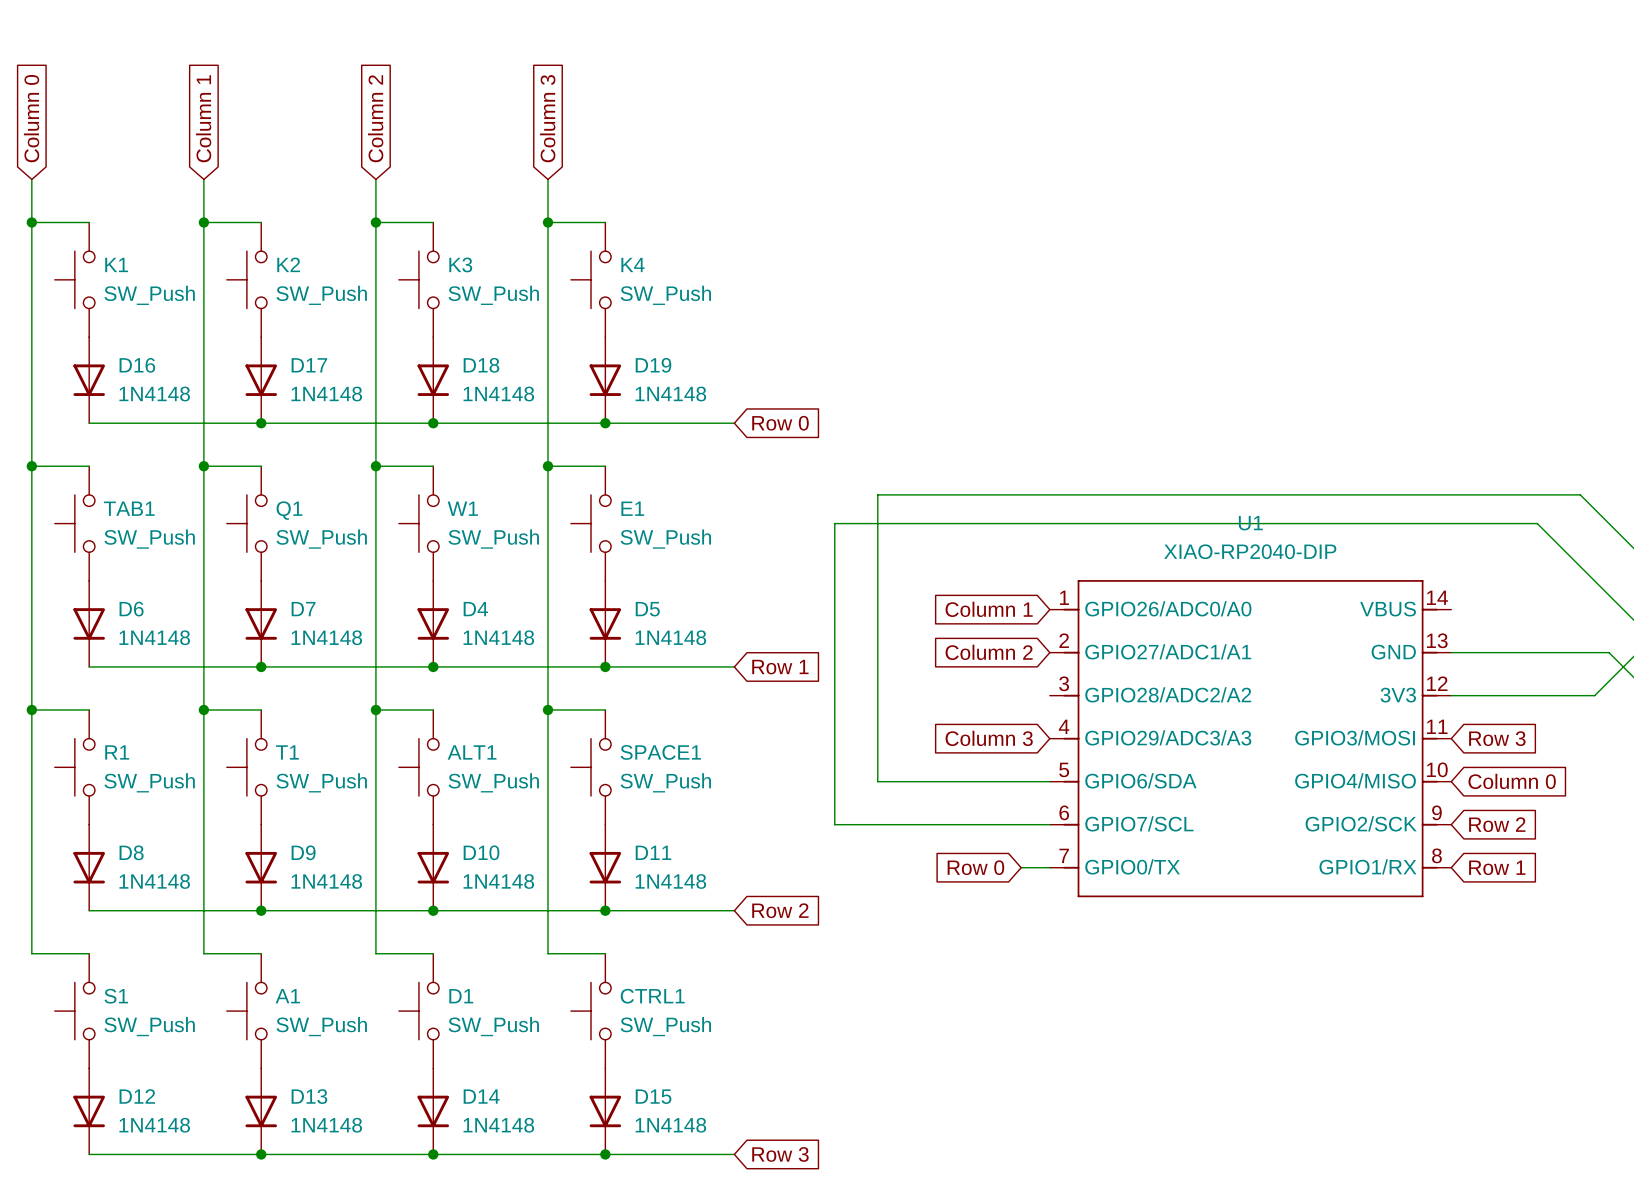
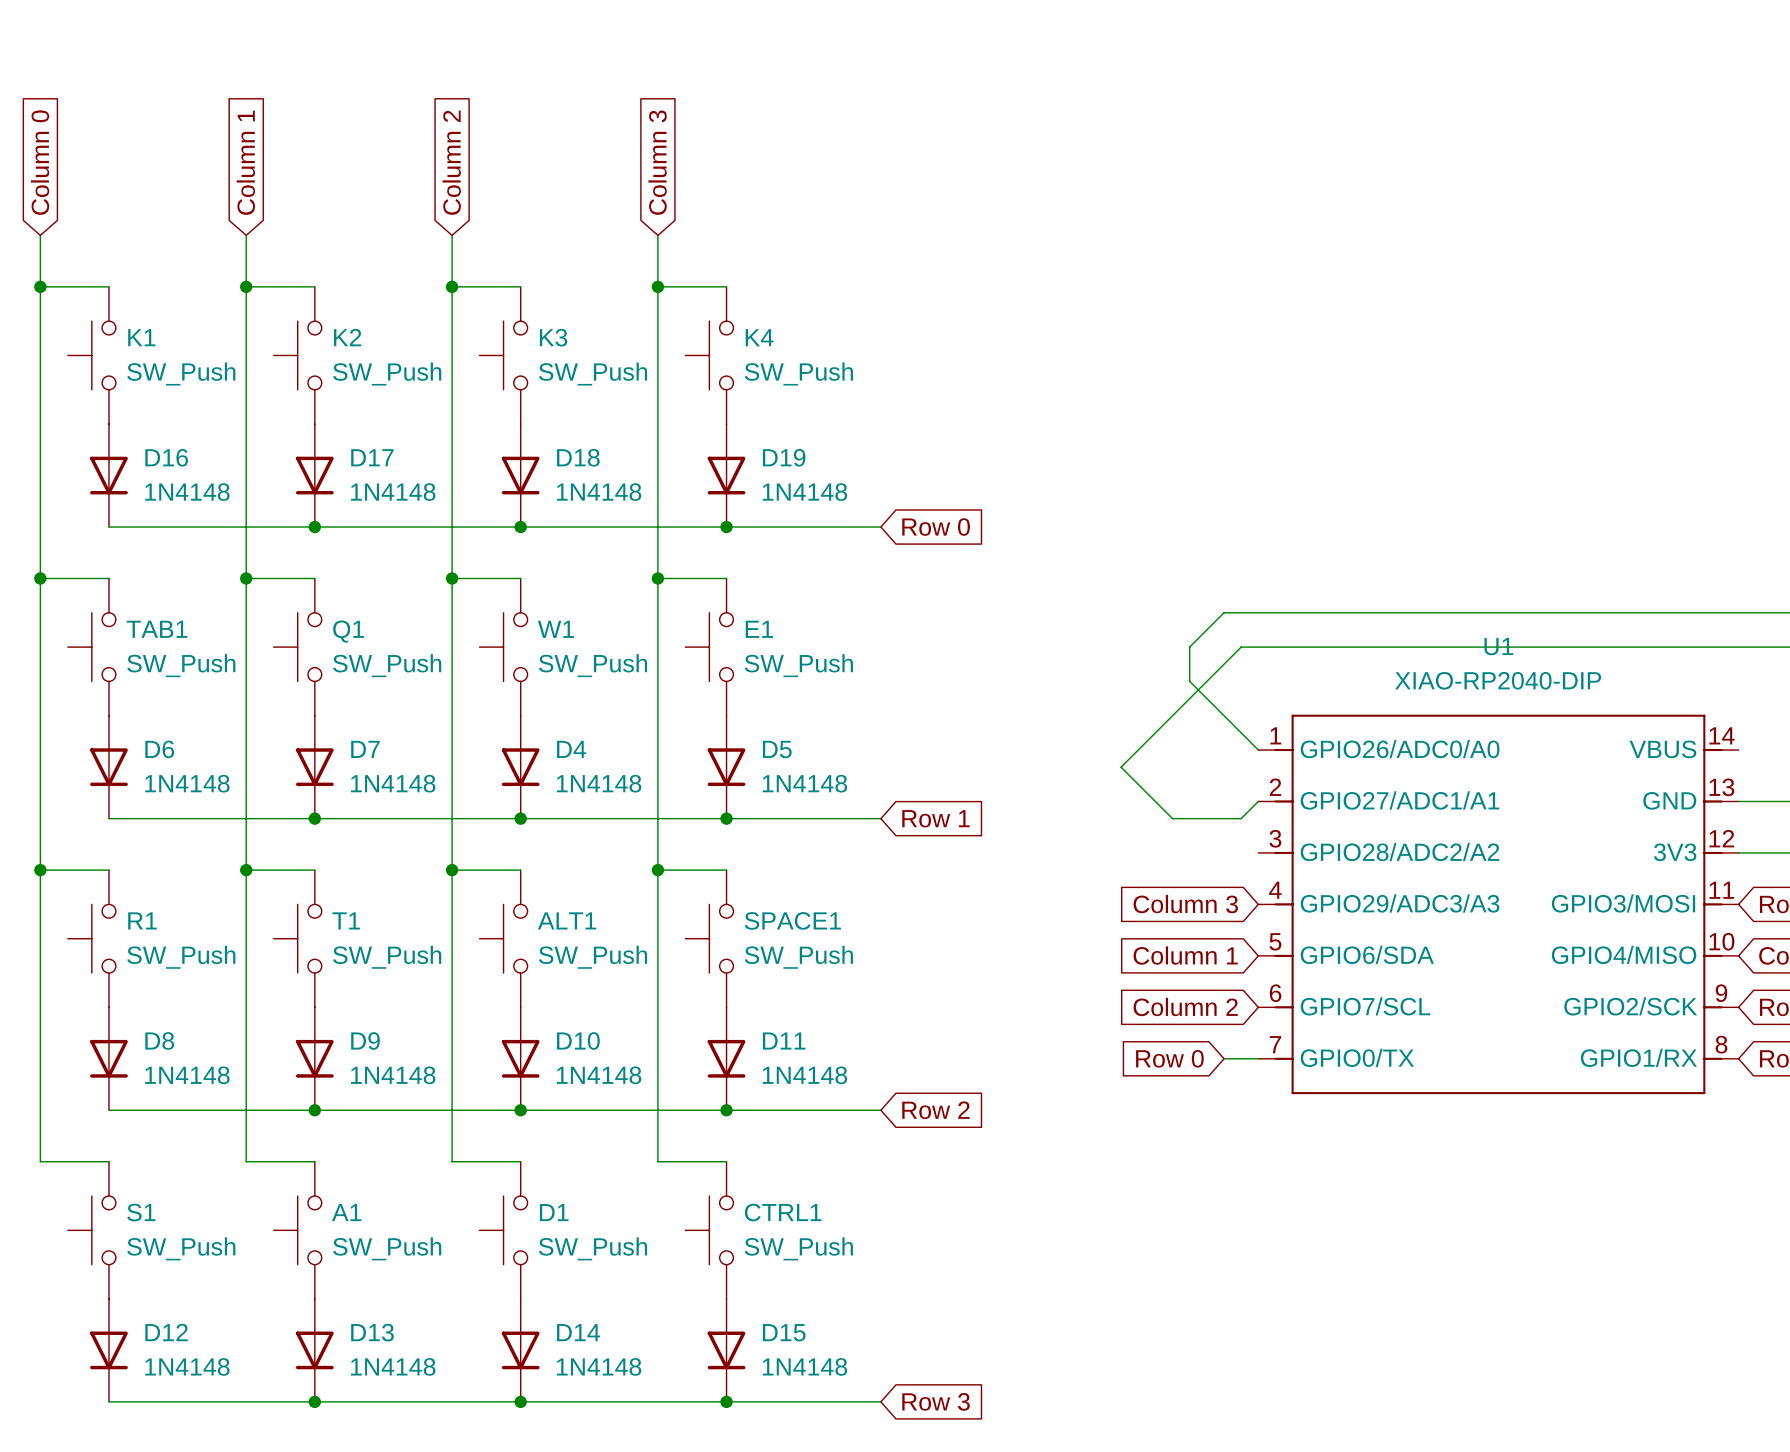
wire: (1021, 494) (877, 494) (877, 781) (1049, 781) -> (1224, 612) (1189, 647) (1189, 681) (1258, 750)
wire: (1035, 523) (834, 523) (834, 824) (1049, 824) -> (1241, 647) (1121, 767) (1172, 818) (1241, 818) (1258, 801)
global label position: Column 1 (989, 609) -> Column 1 (1185, 955)
global label position: Column 2 (989, 652) -> Column 2 (1185, 1007)

